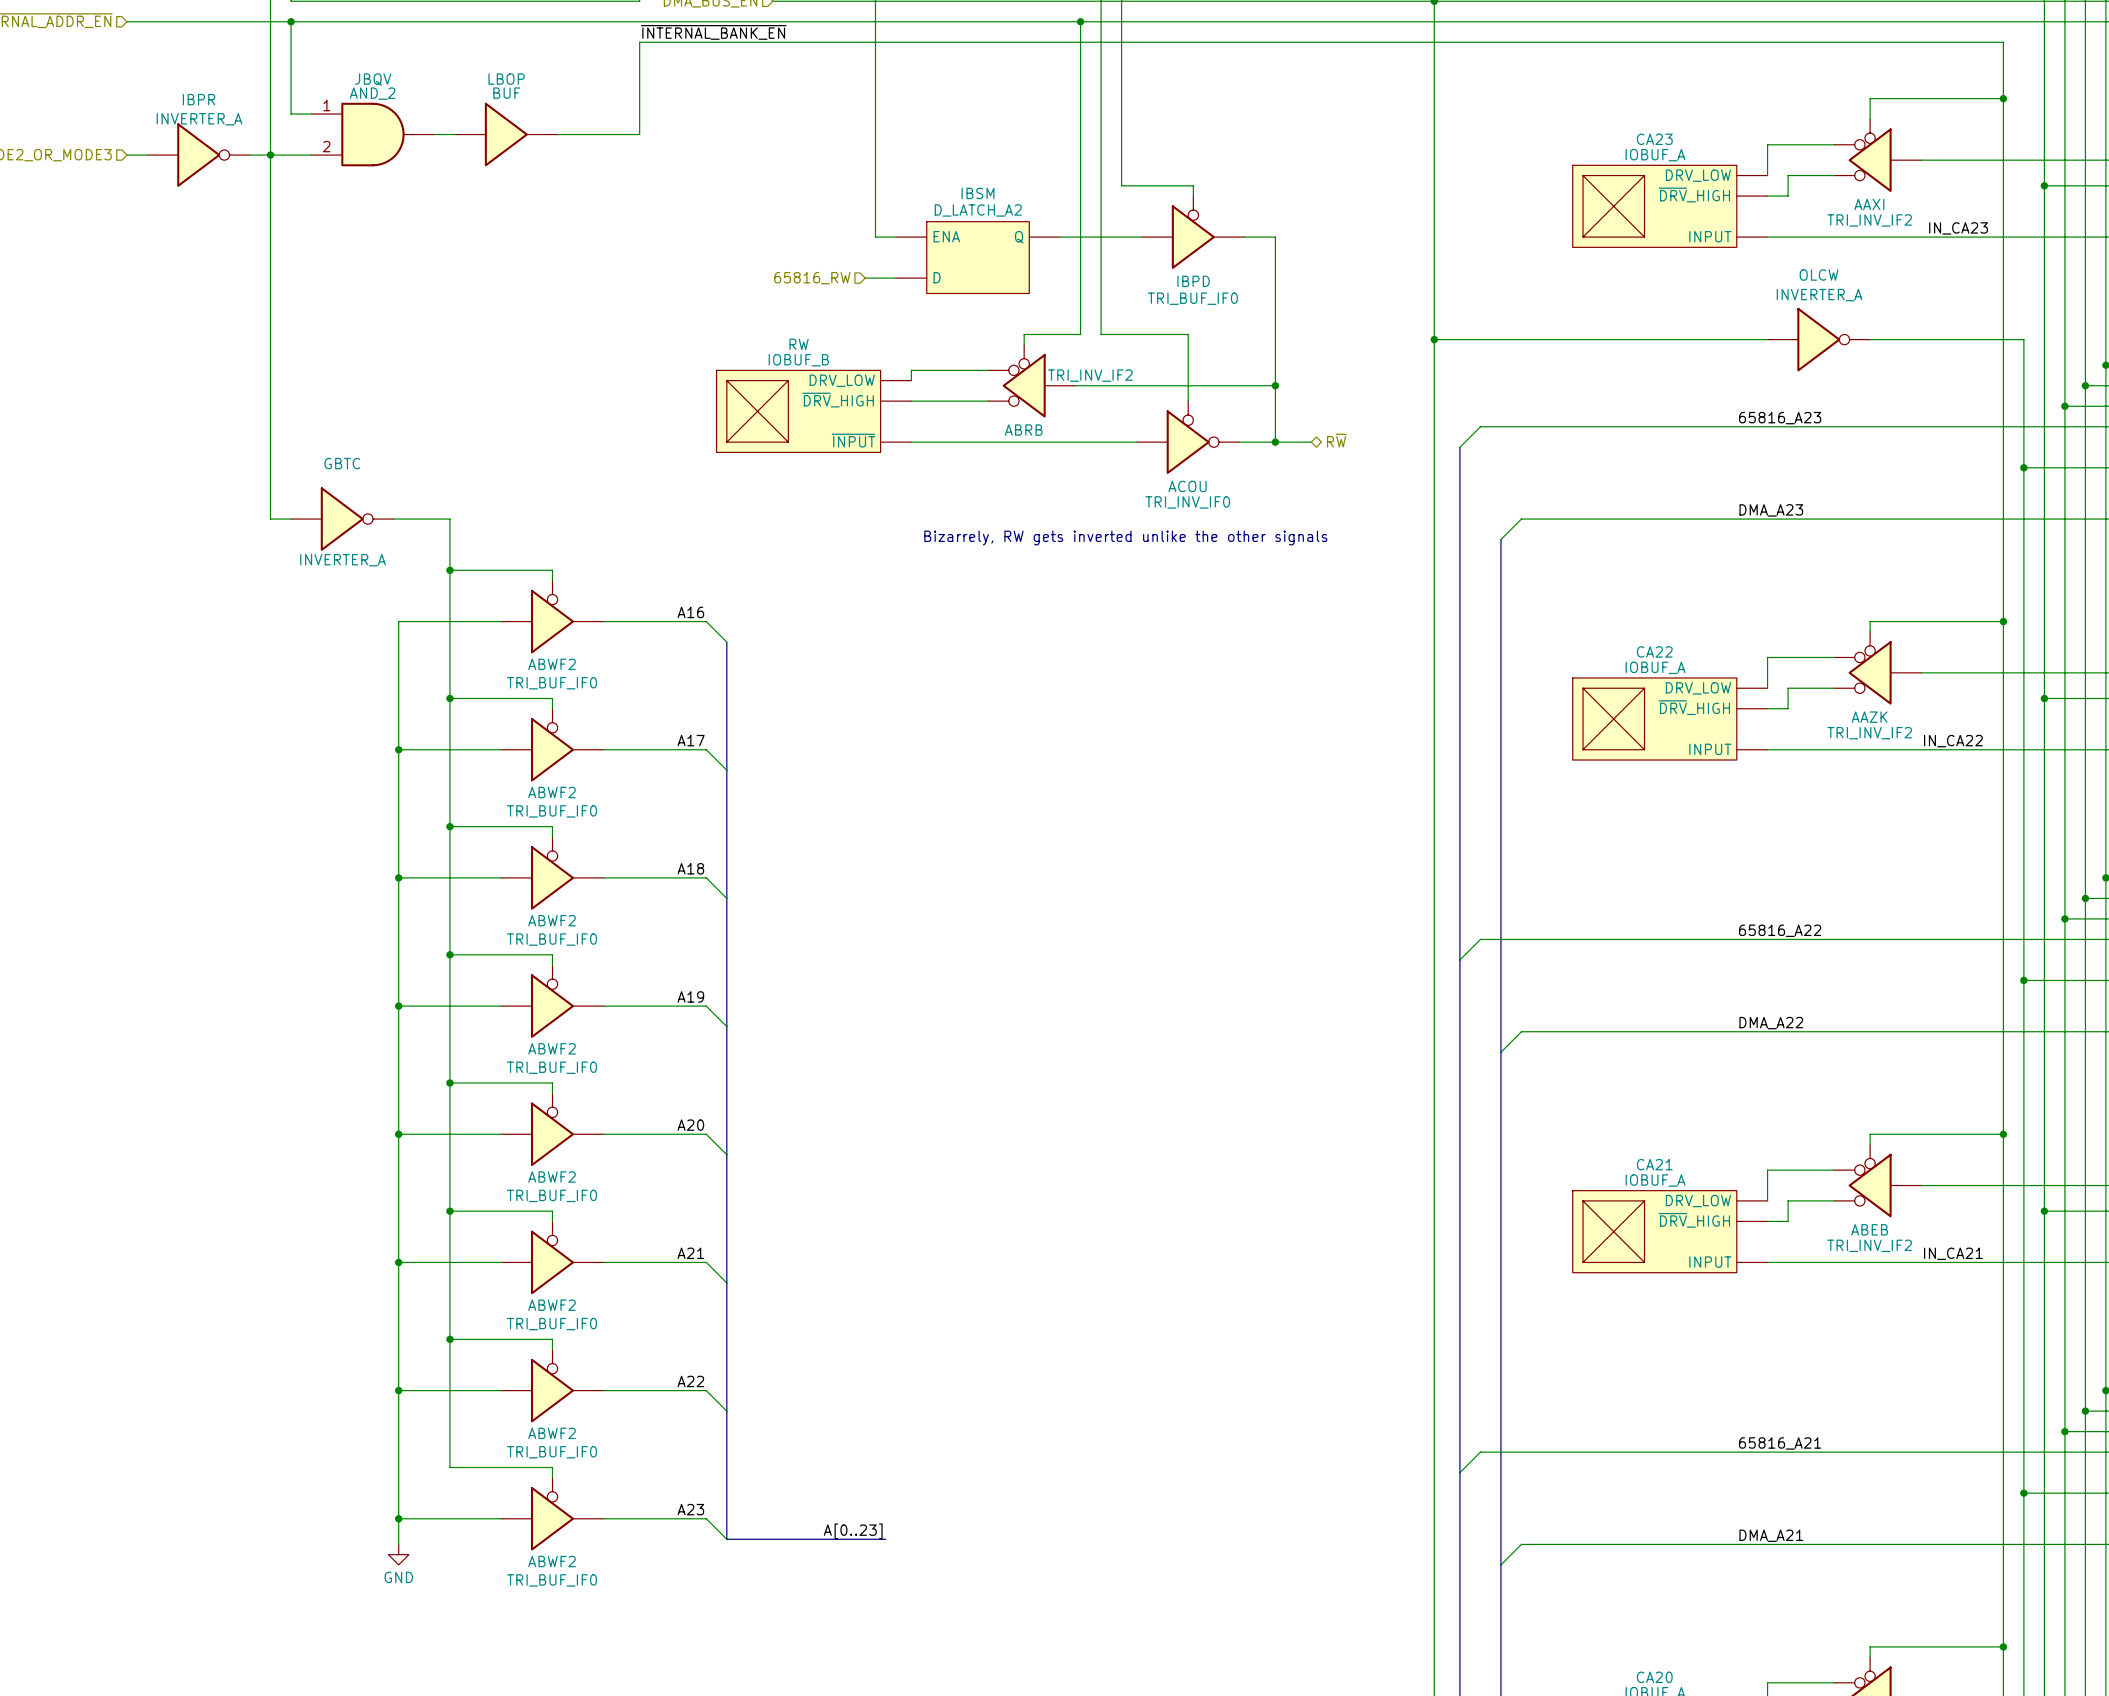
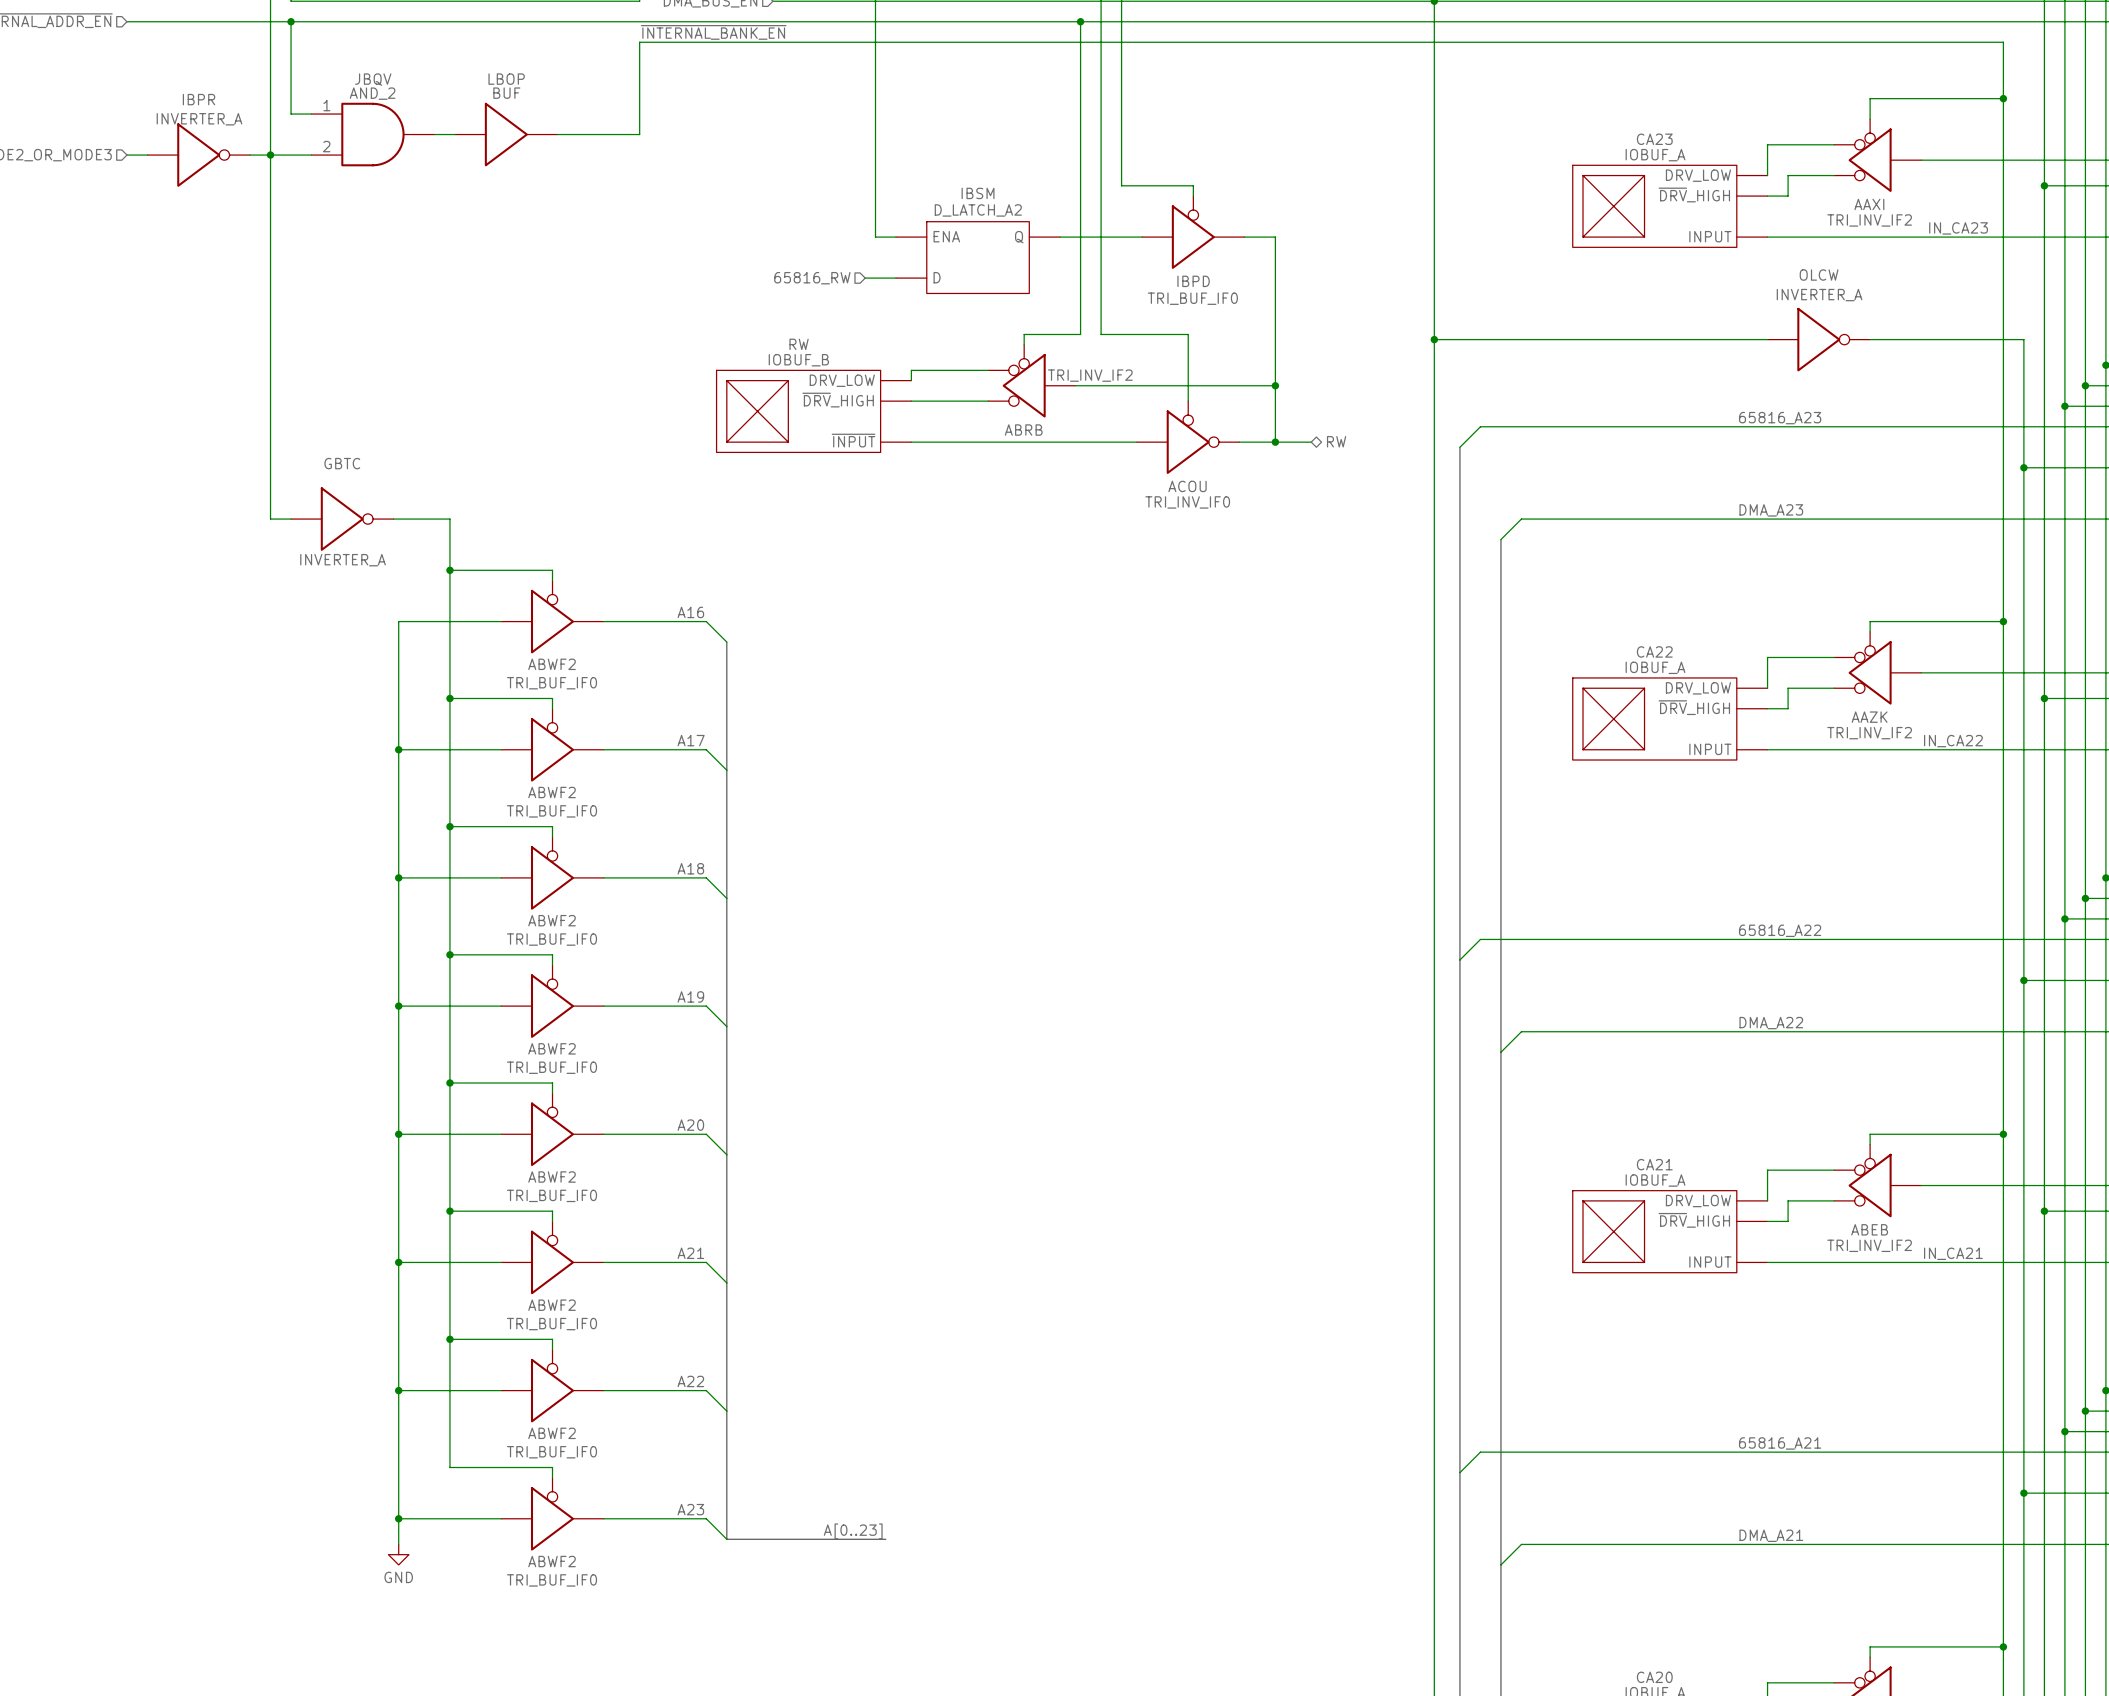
hierarchical label: R~{W} (1336, 440) -> RW (1336, 441)
text: Bizarrely, RW gets inverted unlike the other signals (1125, 537) -> none

